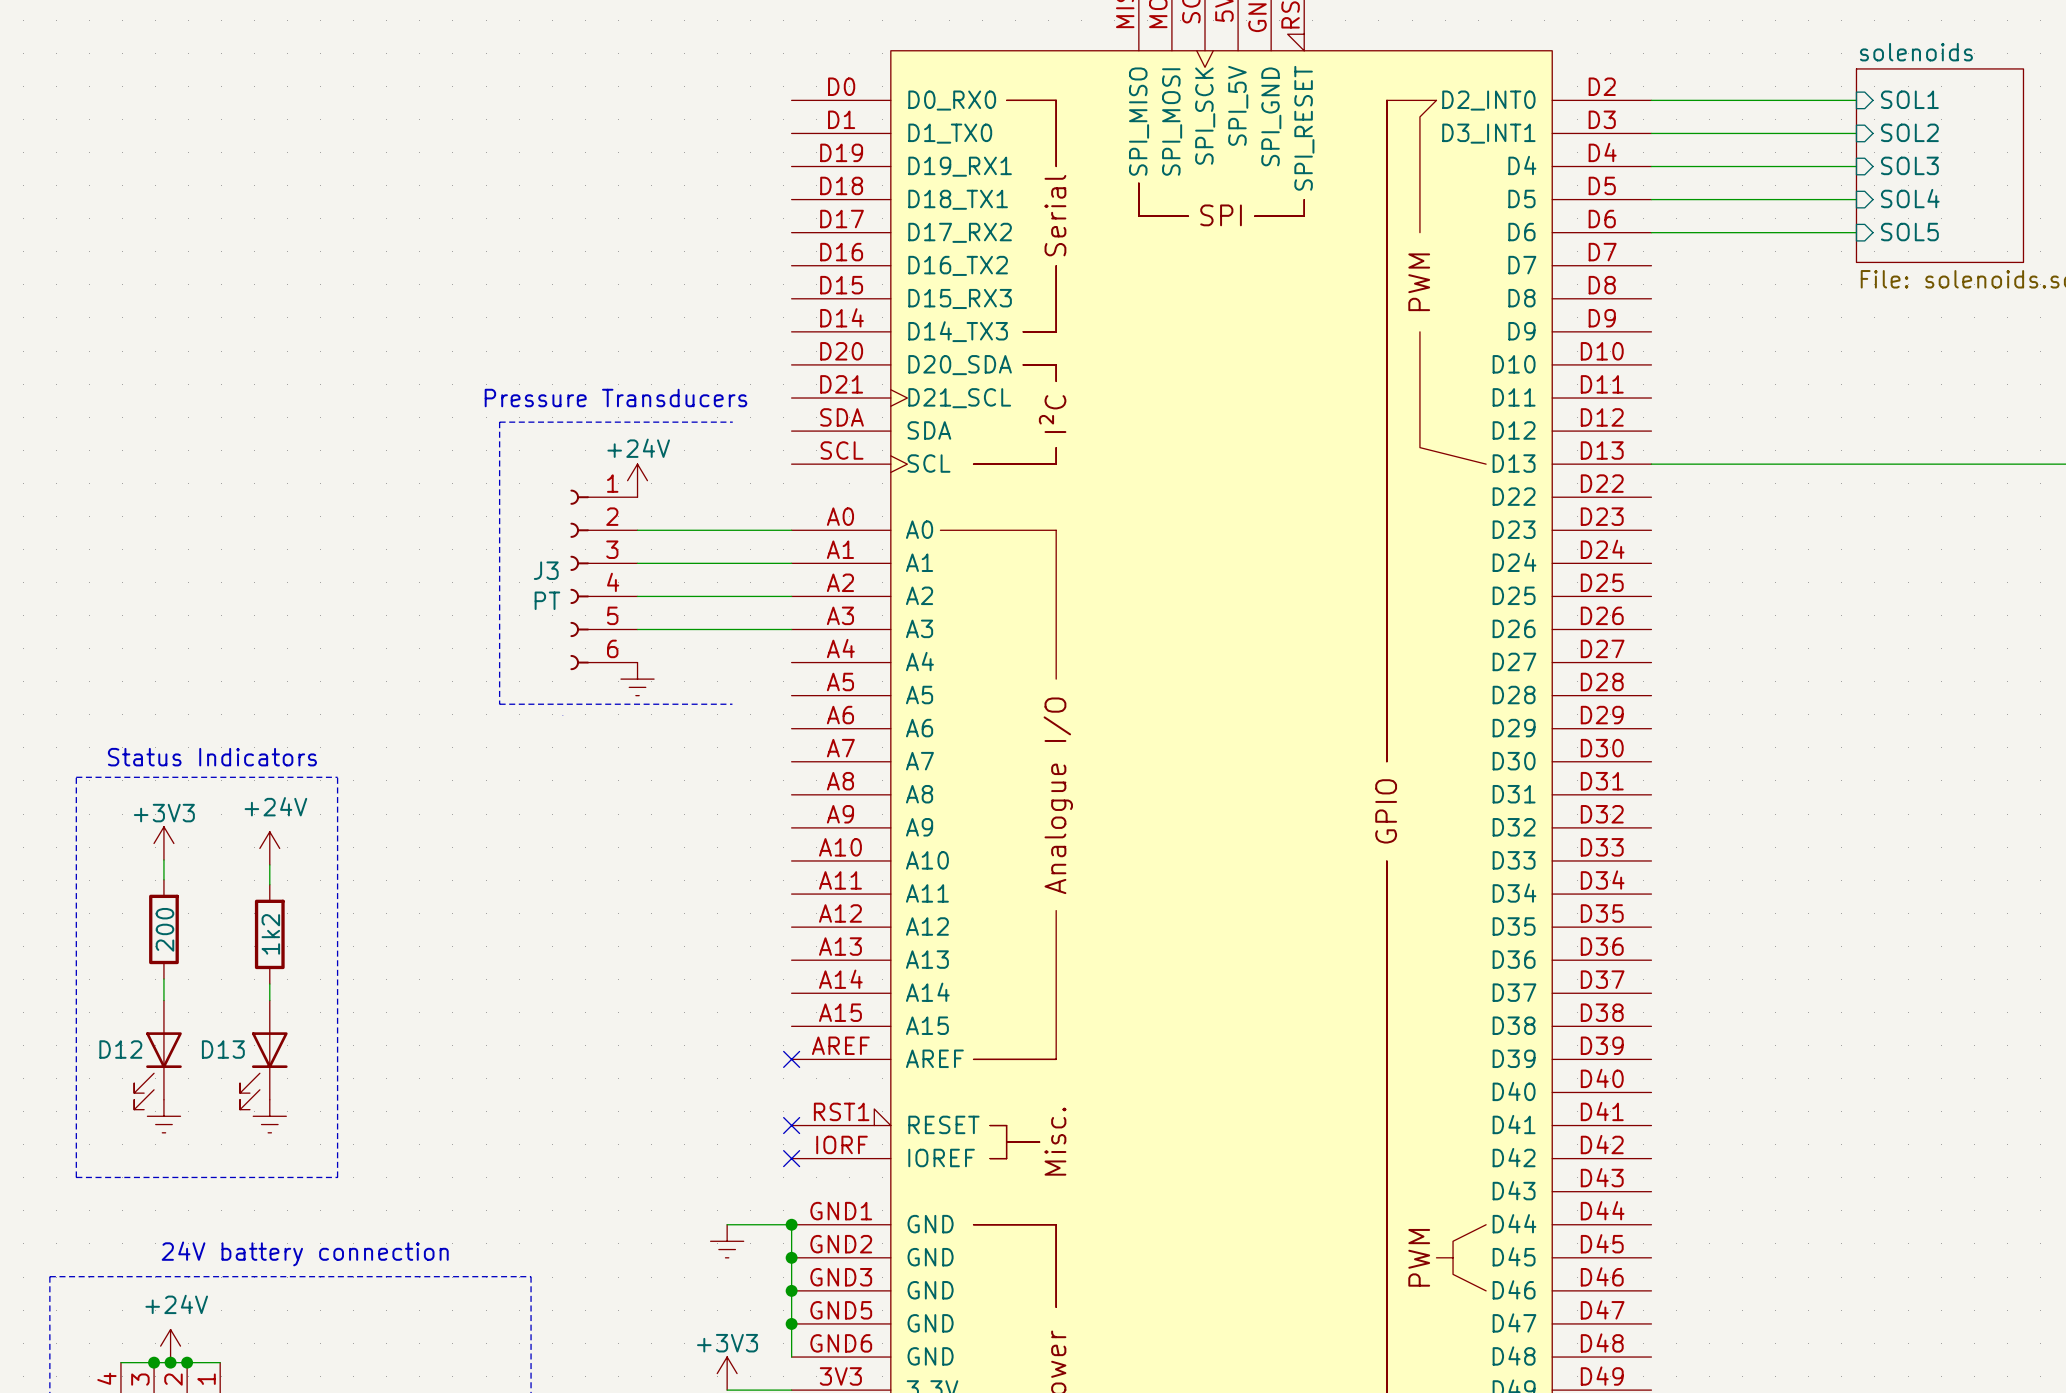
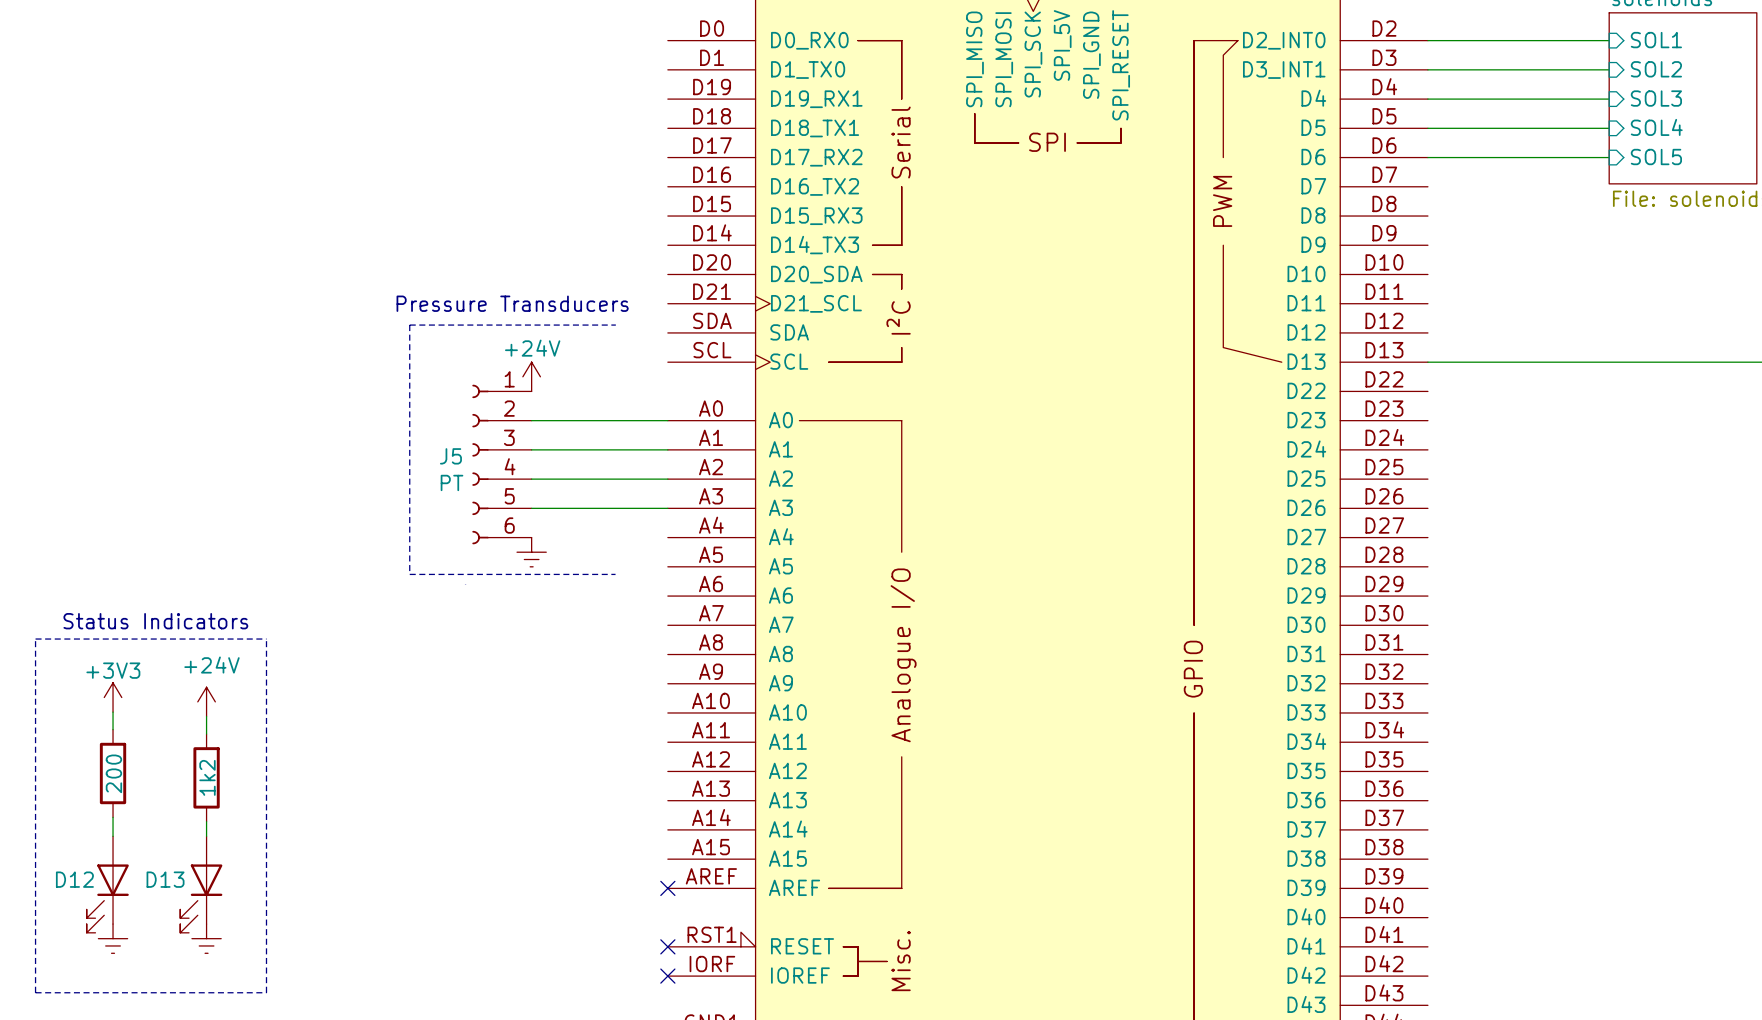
J3 name: J3 (546, 570) -> J5 (450, 456)

